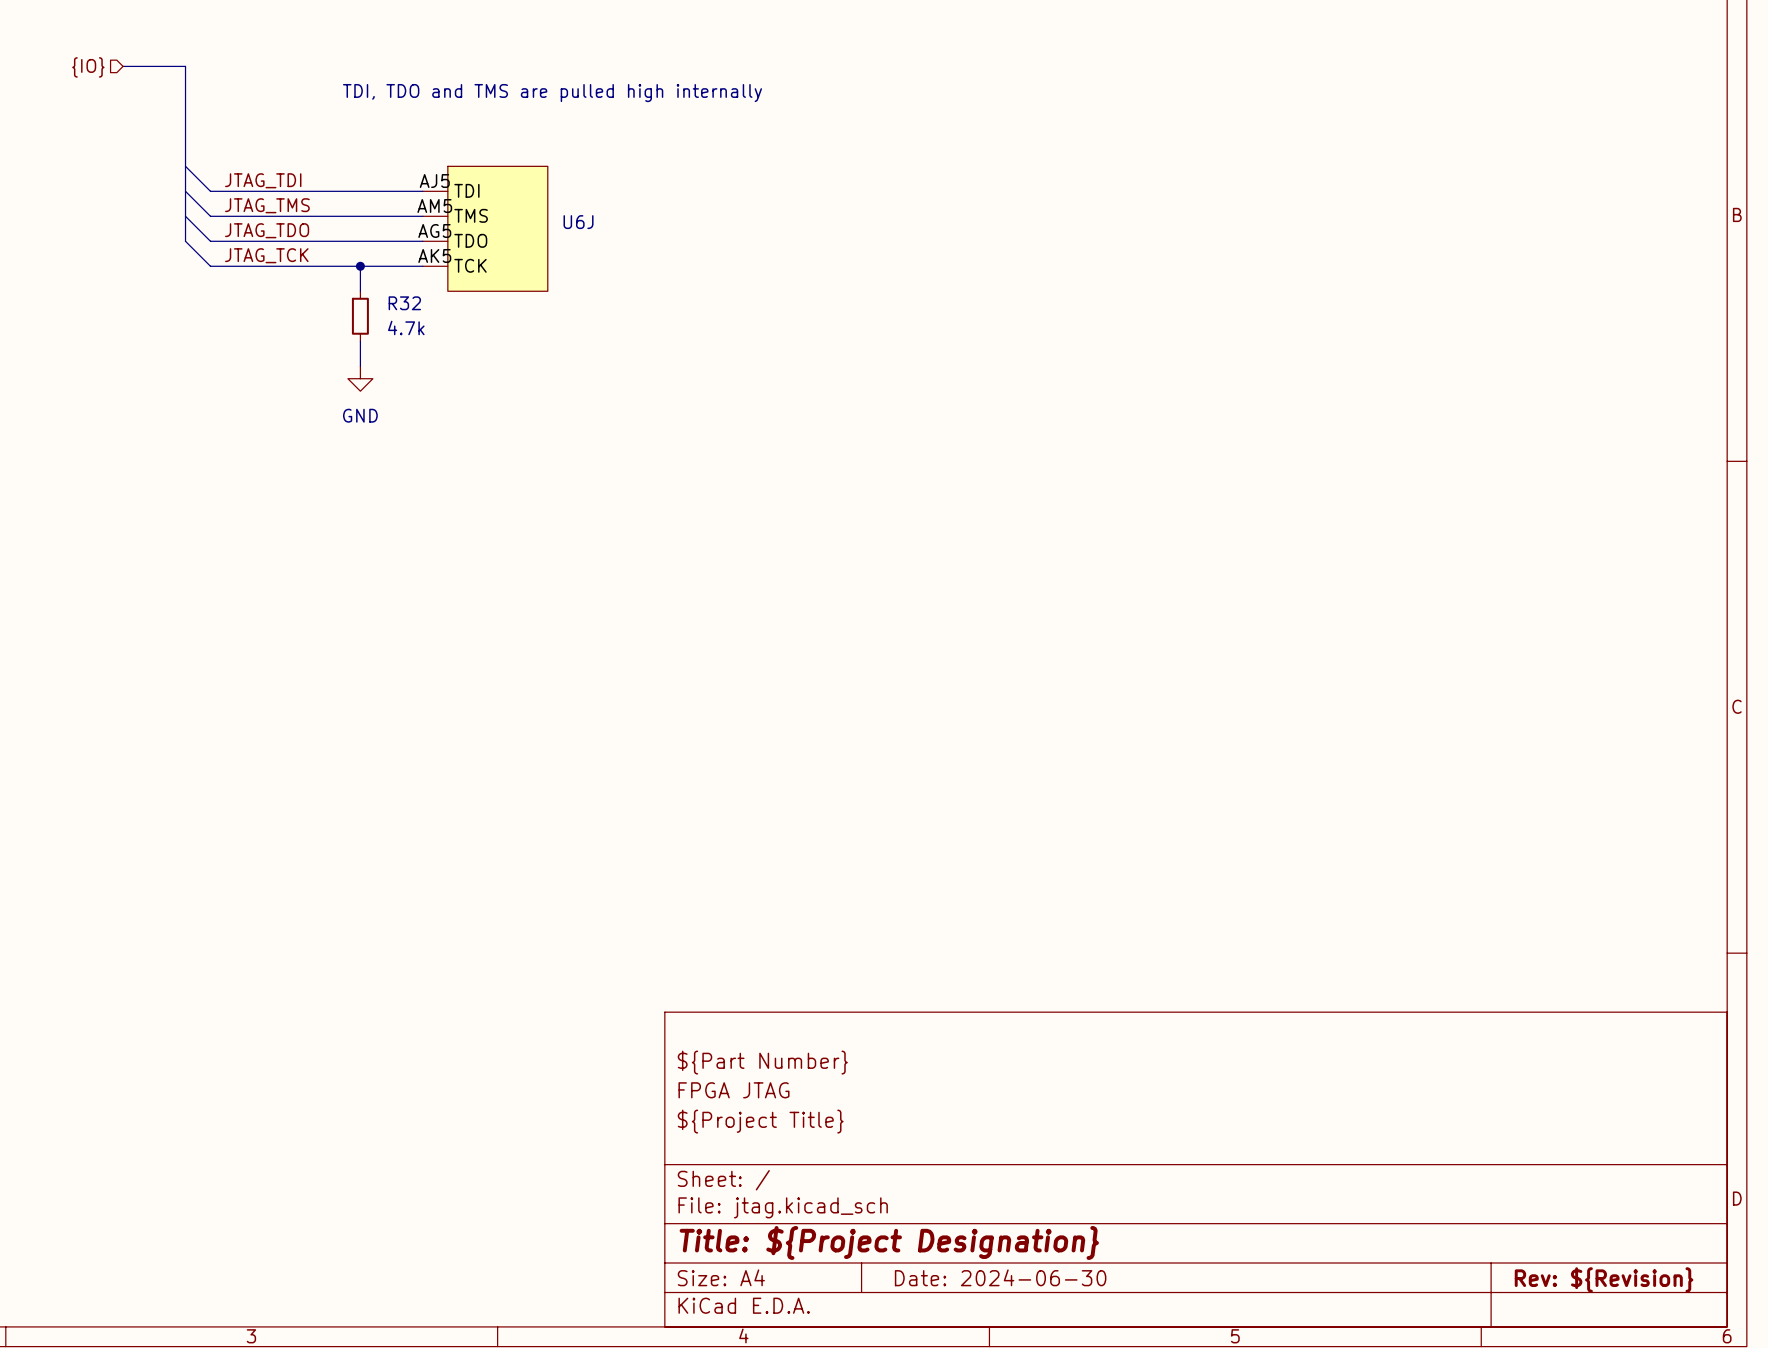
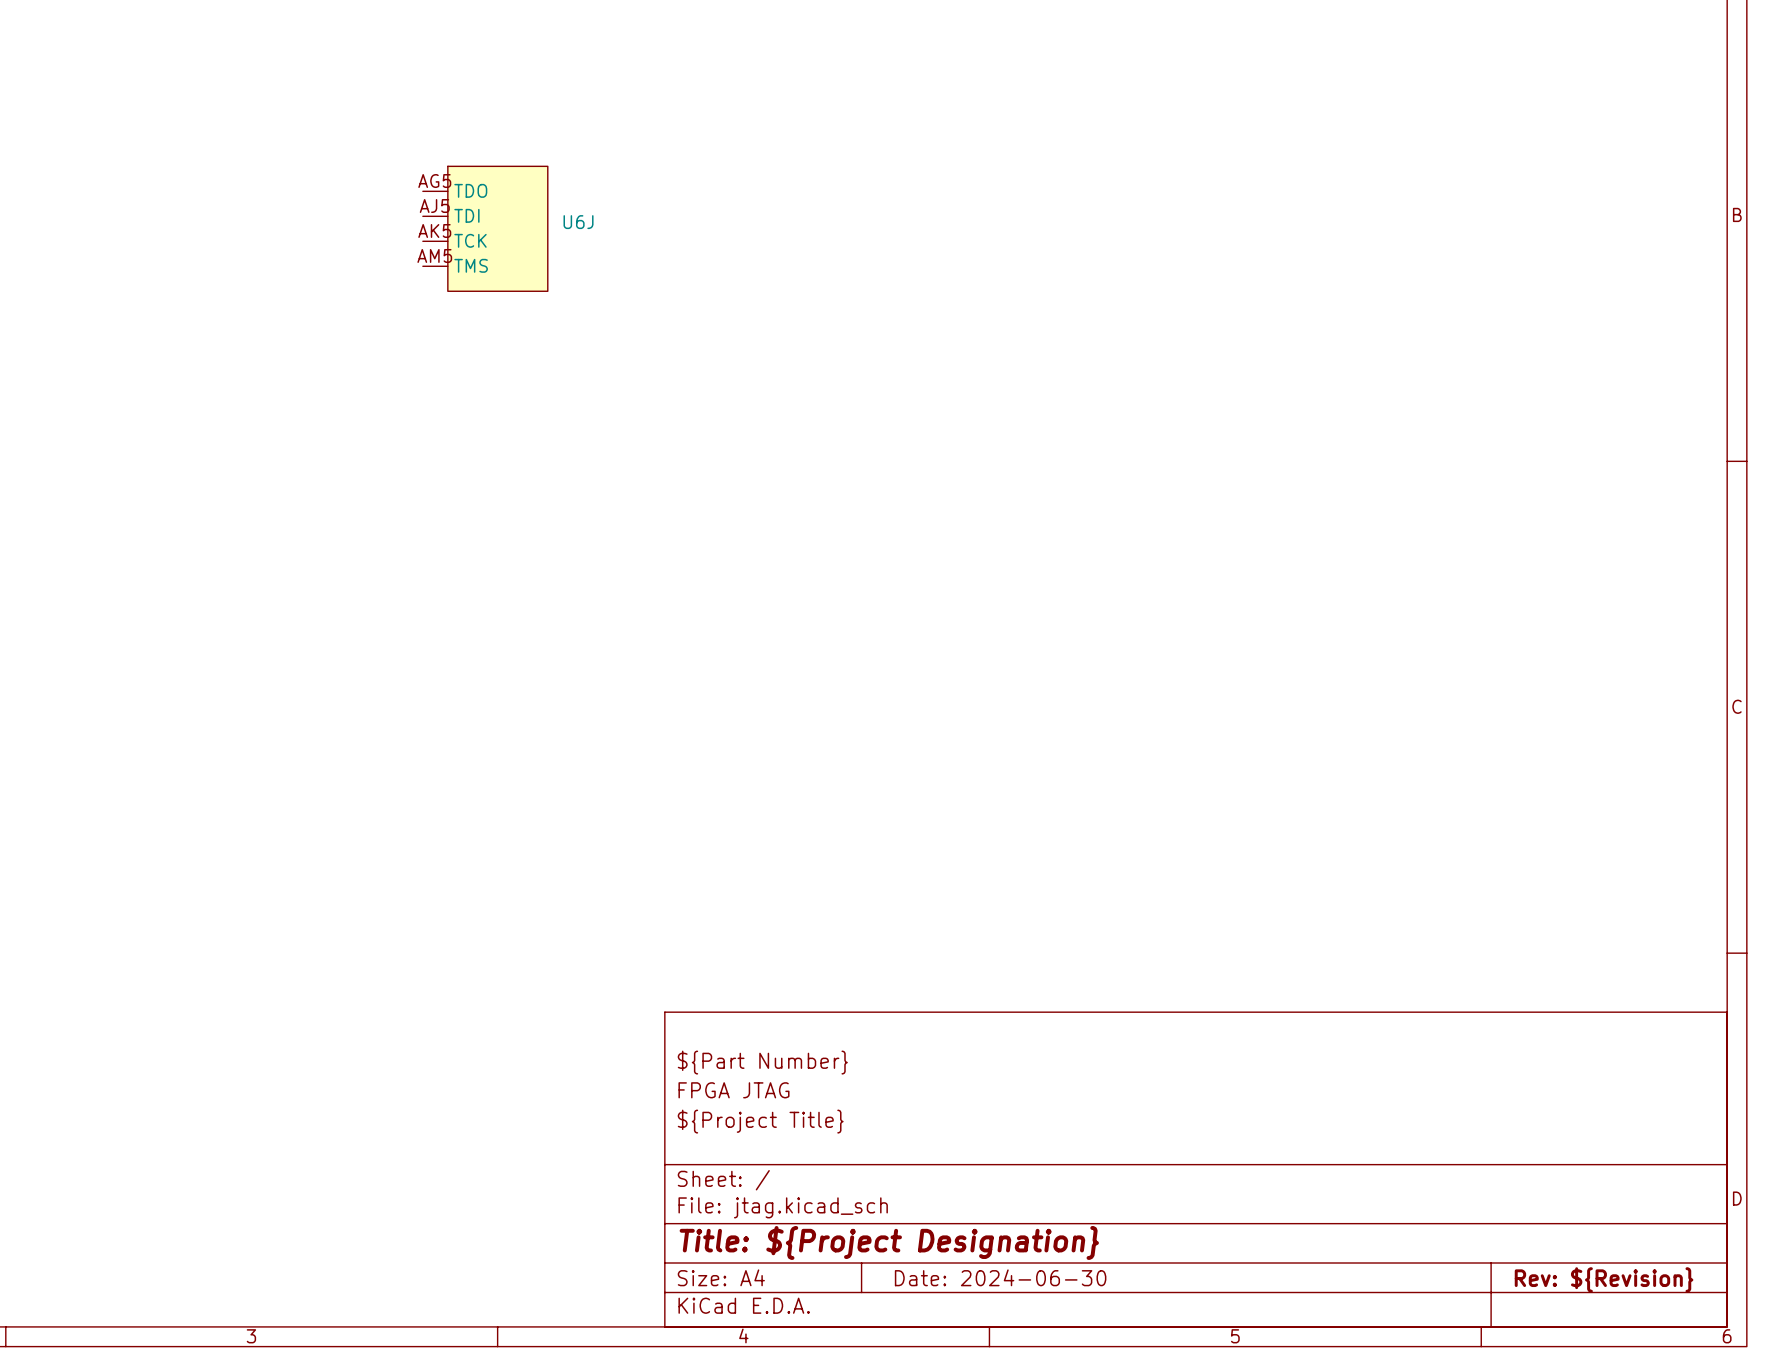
bus: (123, 66) (185, 66) (185, 241) -> none
hierarchical label: {IO} (88, 67) -> none
text: TDI, TDO and TMS are pulled high internally (552, 93) -> none
wire: (185, 166) (210, 191) (422, 191) -> none
label: JTAG_TDI (263, 180) -> none
U6J pin number: AJ5 (434, 181) -> AG5 (434, 181)
U6J pin name: TDI (466, 190) -> TDO (470, 190)
wire: (185, 191) (210, 216) (422, 216) -> none
label: JTAG_TMS (267, 205) -> none
U6J pin number: AM5 (434, 206) -> AJ5 (434, 206)
U6J pin name: TMS (471, 215) -> TDI (466, 215)
wire: (185, 216) (210, 241) (422, 241) -> none
label: JTAG_TDO (267, 230) -> none
U6J pin number: AG5 (434, 230) -> AK5 (434, 230)
U6J pin name: TDO (470, 240) -> TCK (470, 240)
wire: (185, 241) (210, 266) (422, 266) -> none
label: JTAG_TCK (266, 255) -> none
U6J pin number: AK5 (434, 255) -> AM5 (434, 255)
U6J pin name: TCK (470, 265) -> TMS (471, 265)
wire: (360, 266) (360, 291) -> none
junction: (360, 266) -> none
R32: 4.7k (360, 316) -> none
wire: (360, 341) (360, 366) -> none
power symbol: GND (360, 378) -> none

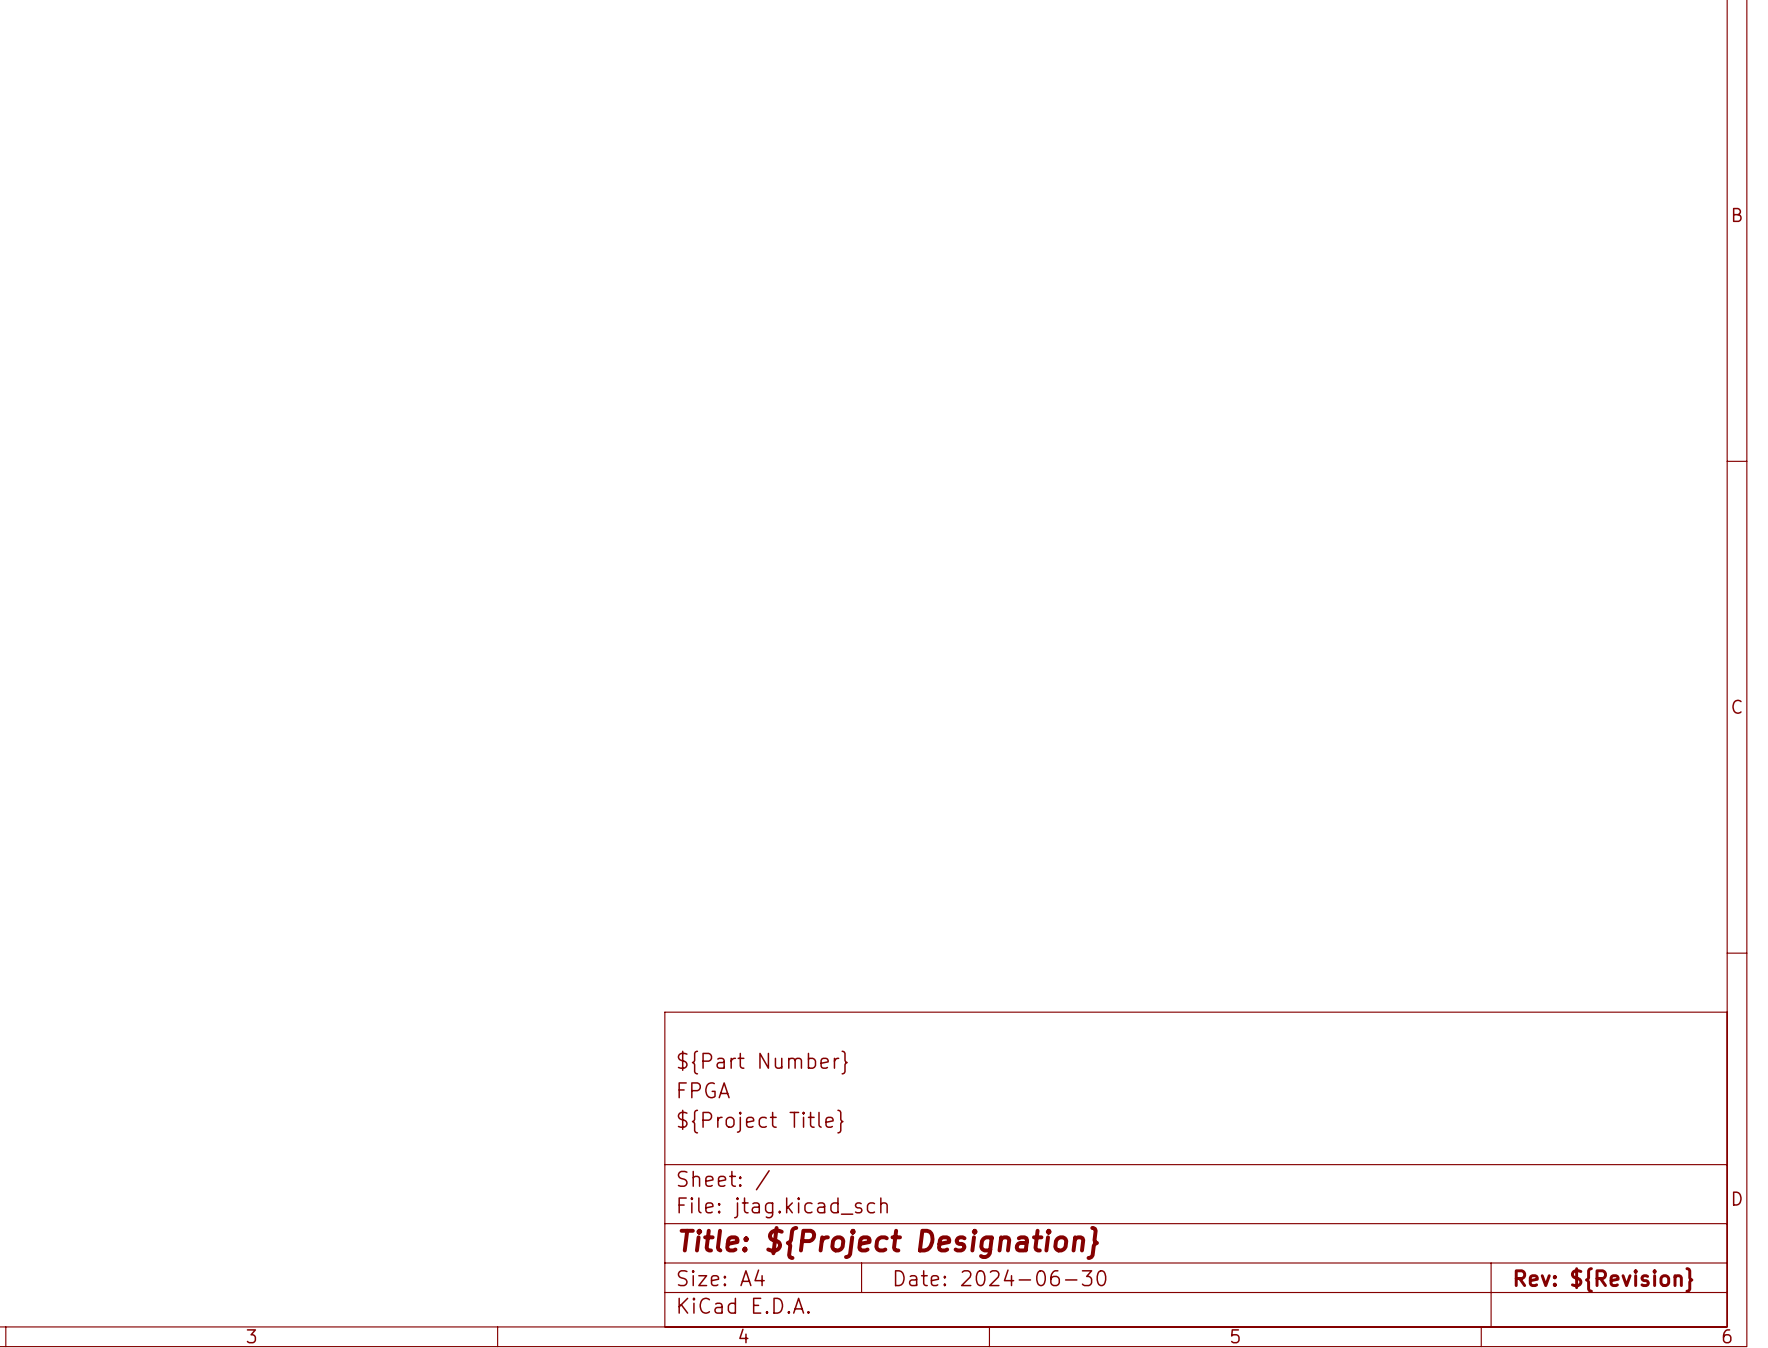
U6J: (485, 228) -> none
title block: FPGA JTAG (733, 1090) -> FPGA (704, 1090)

